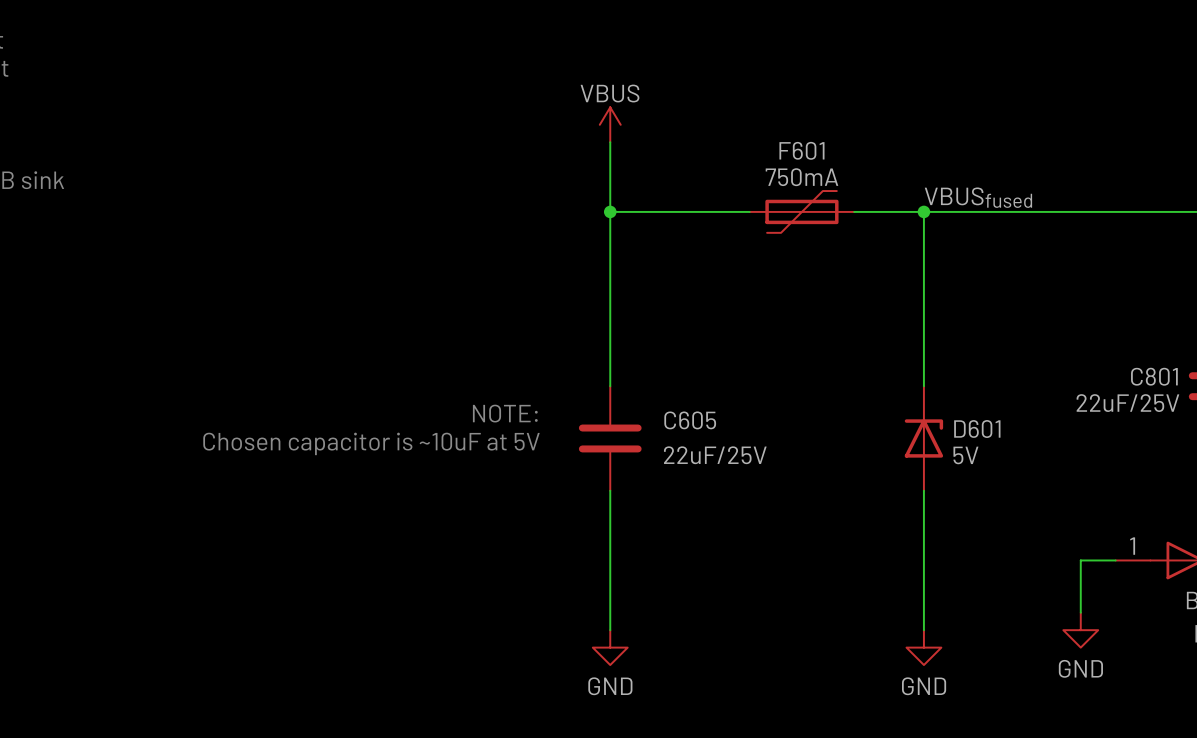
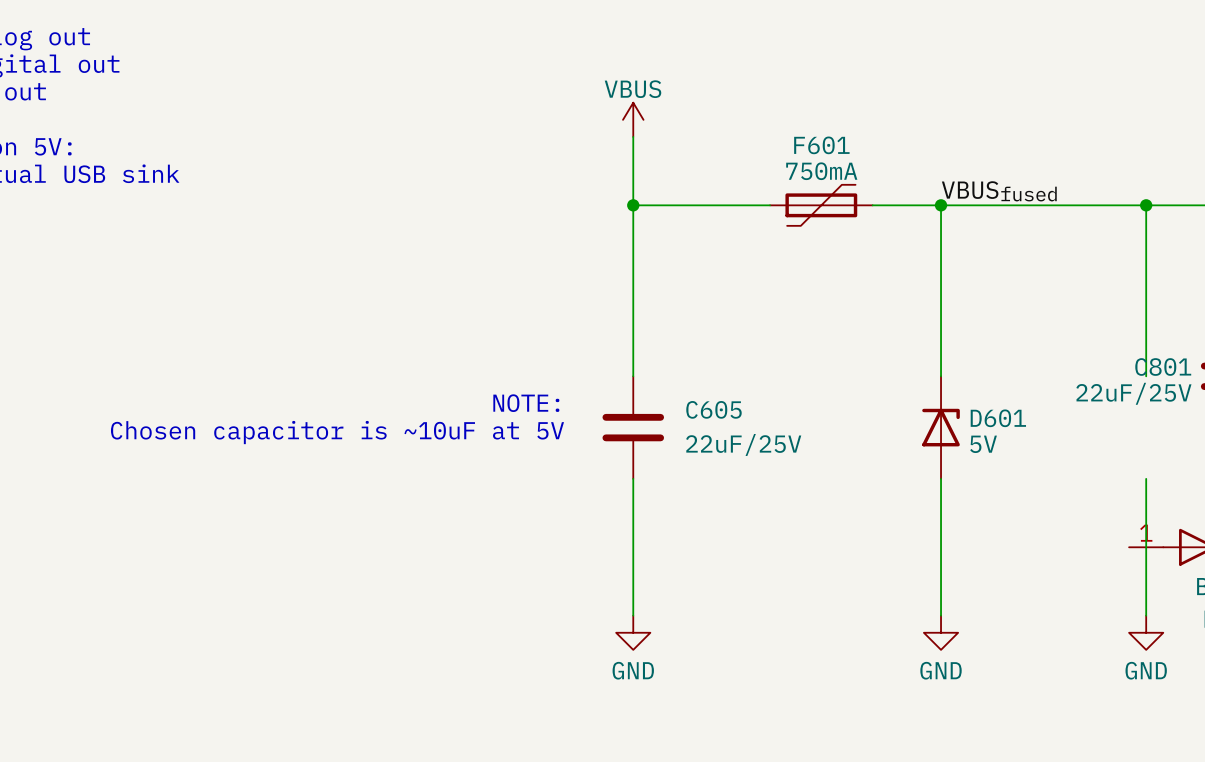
wire: none -> (1146, 205) (1146, 376)
junction: none -> (1146, 205)
wire: none -> (1146, 478) (1146, 615)
wire: (1115, 560) (1080, 560) (1080, 612) -> none
power symbol position: GND (1080, 630) -> GND (1146, 632)

